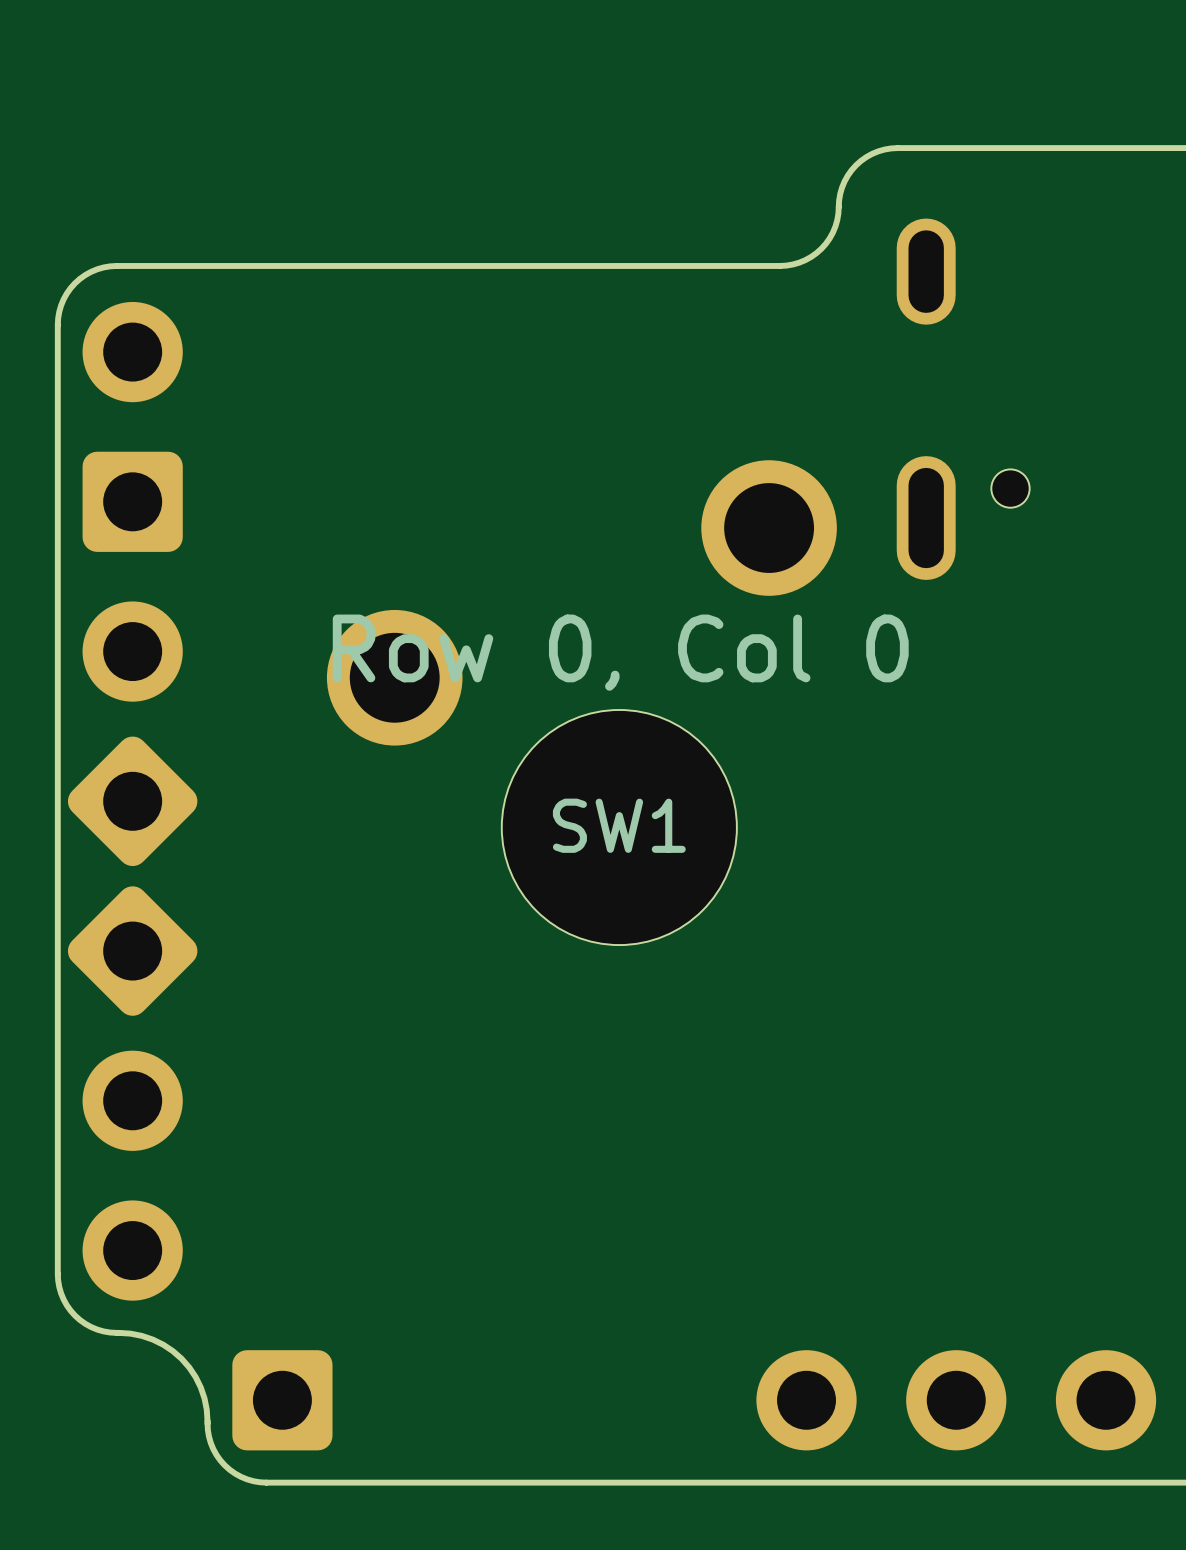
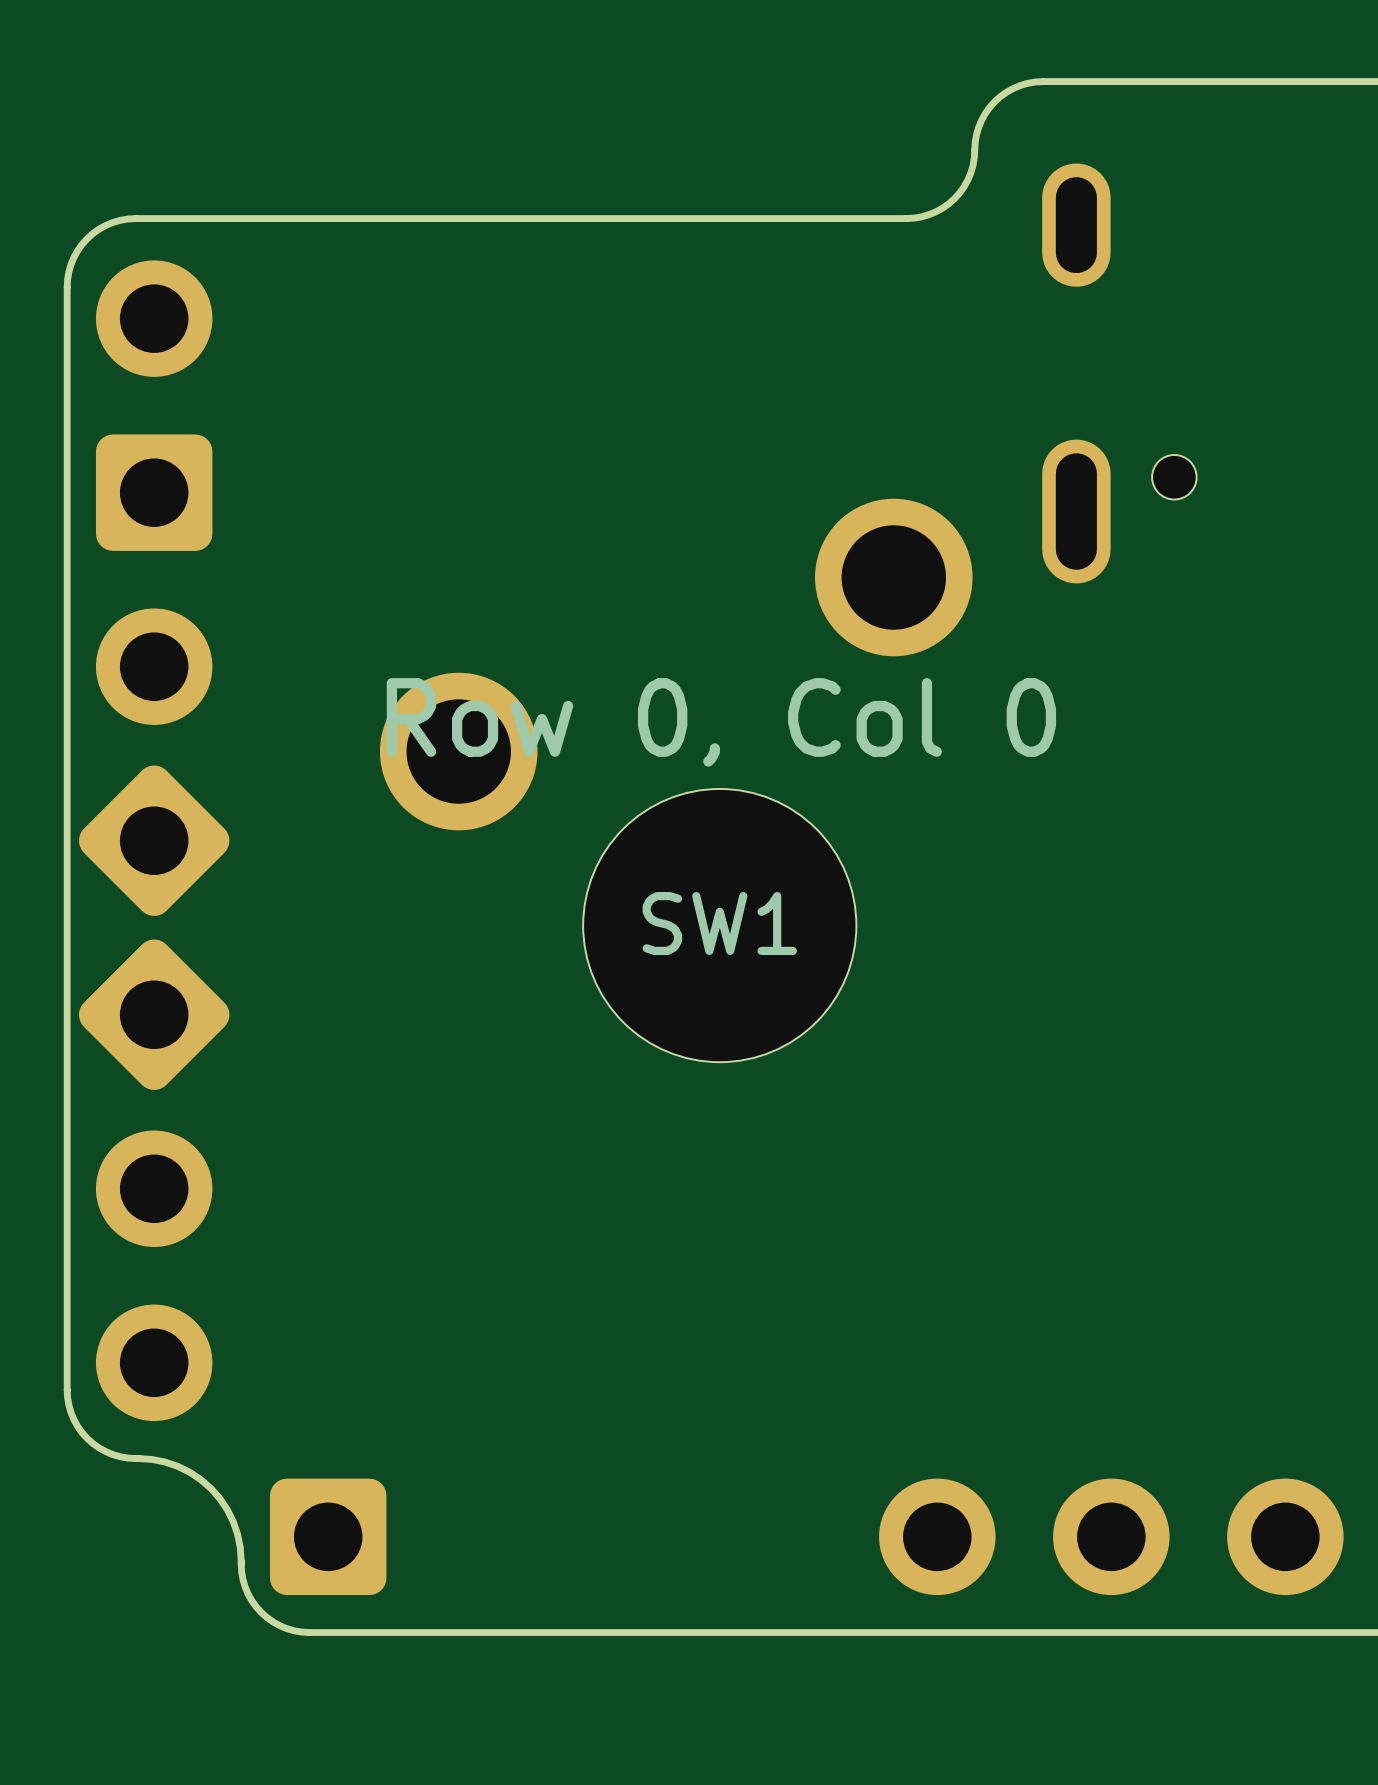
SW1 position: (581, 702) -> (676, 780)

